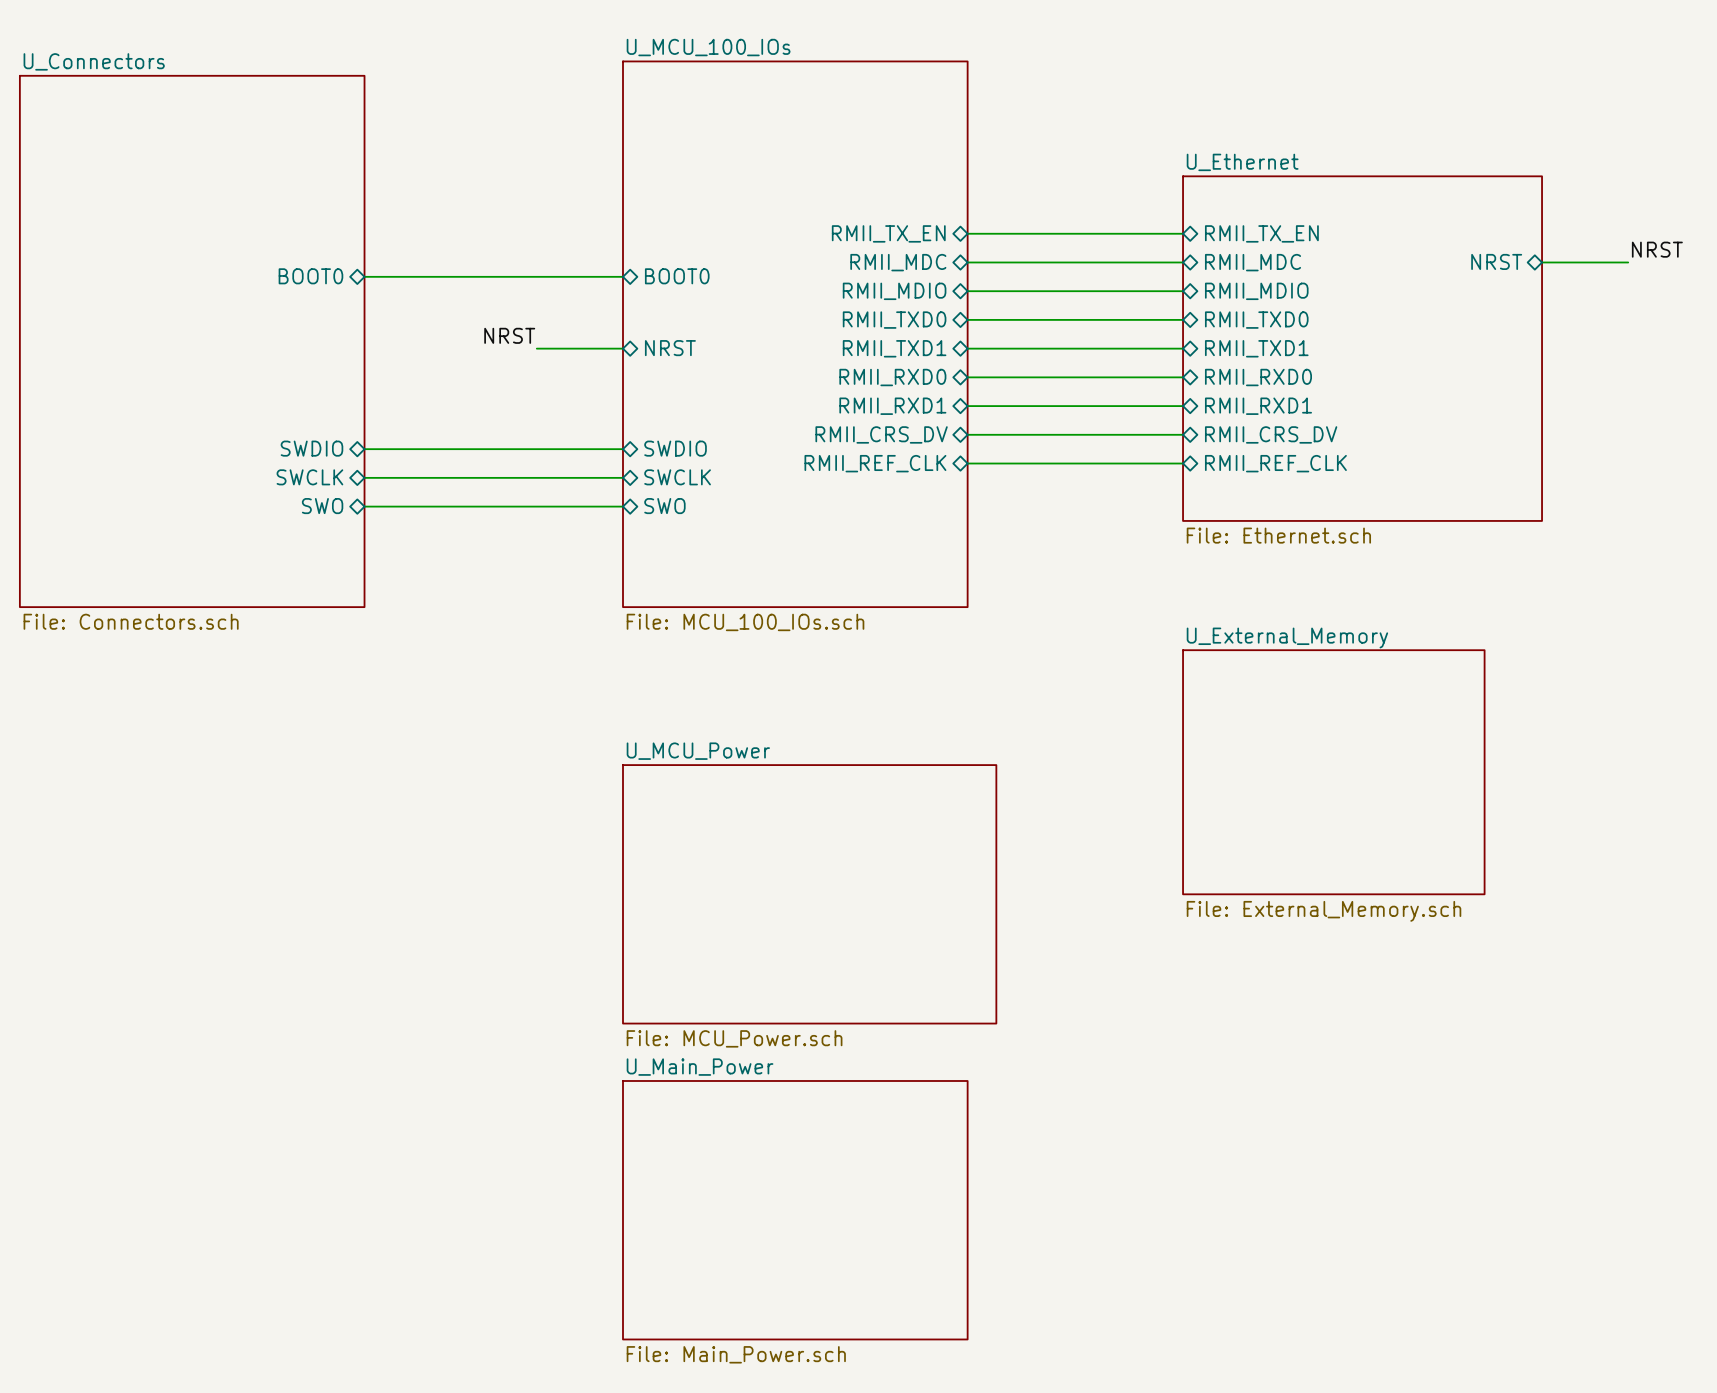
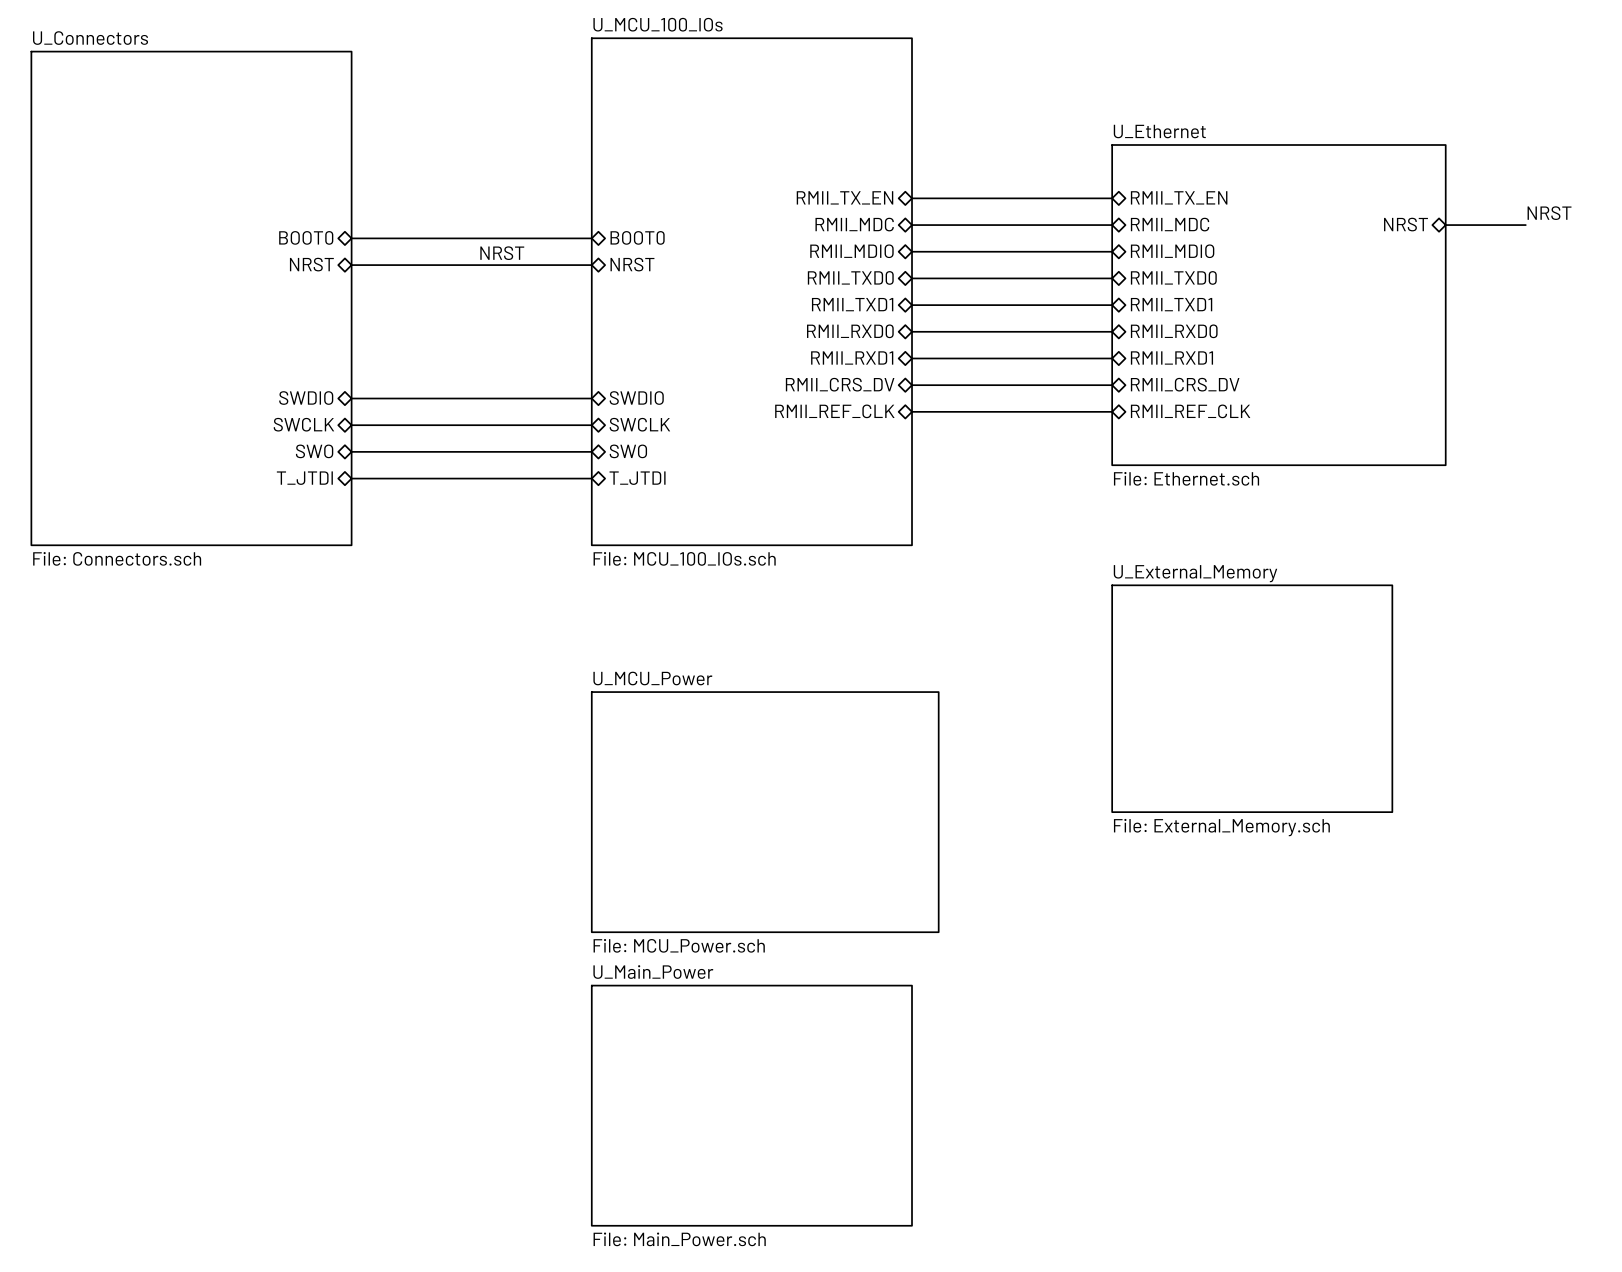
sheet pin: none -> NRST (311, 264)
wire: none -> (351, 265) (591, 265)
label position: NRST (509, 335) -> NRST (502, 253)
wire: (536, 348) (622, 348) -> none
sheet pin position: NRST (670, 348) -> NRST (632, 264)
sheet pin: none -> T_JTDI (304, 478)
wire: none -> (351, 478) (591, 478)
sheet pin: none -> T_JTDI (637, 478)

